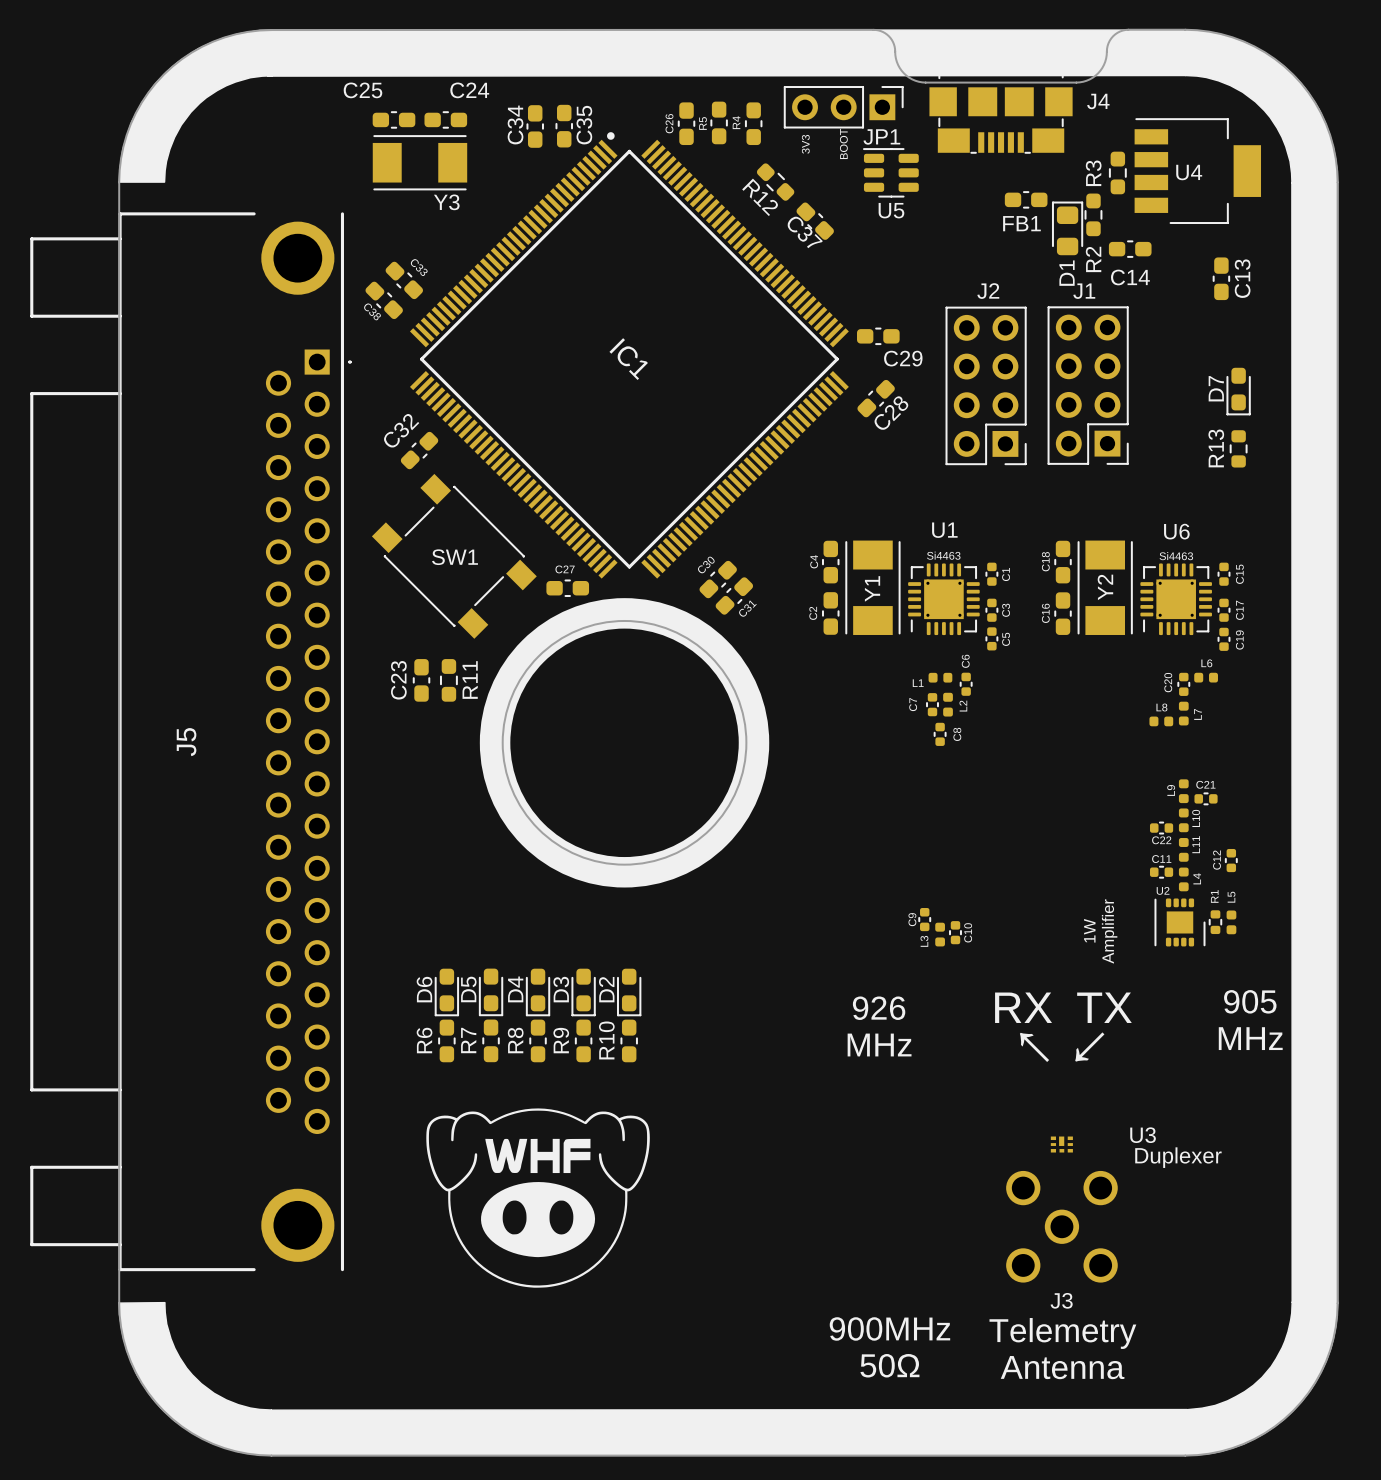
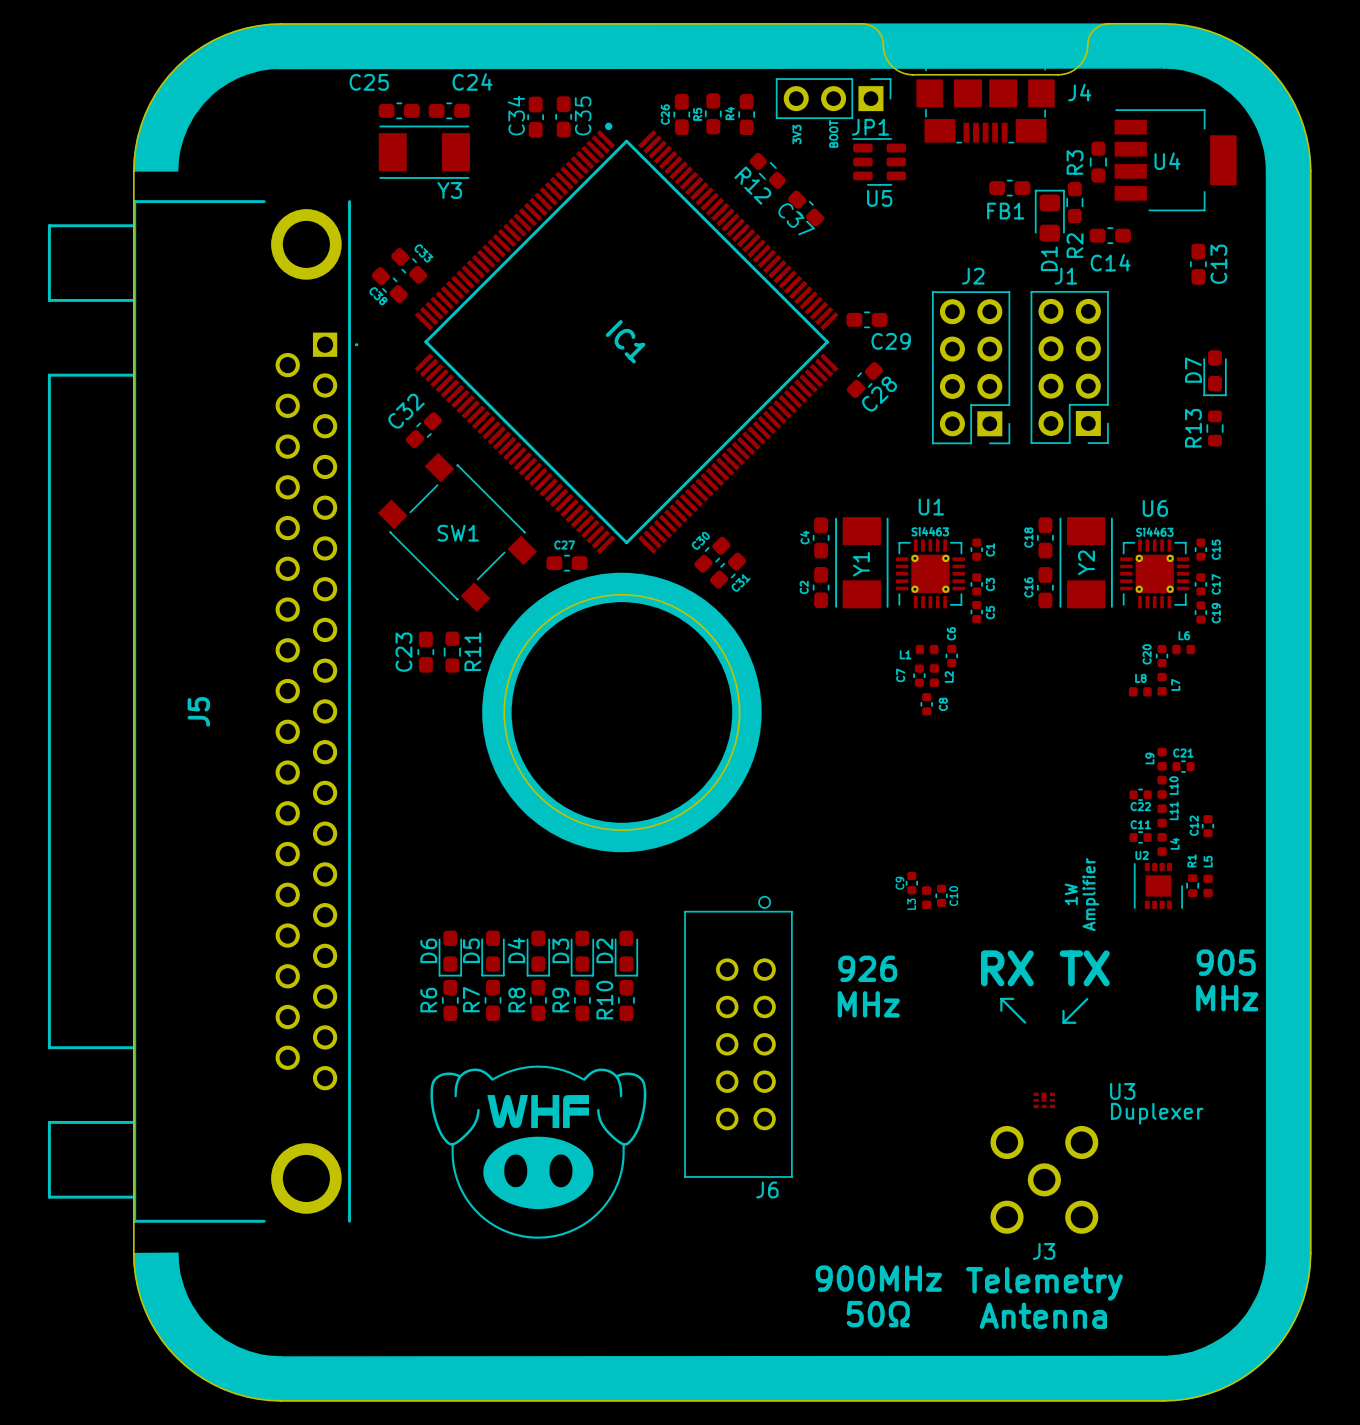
J6: none -> (738, 1036)

